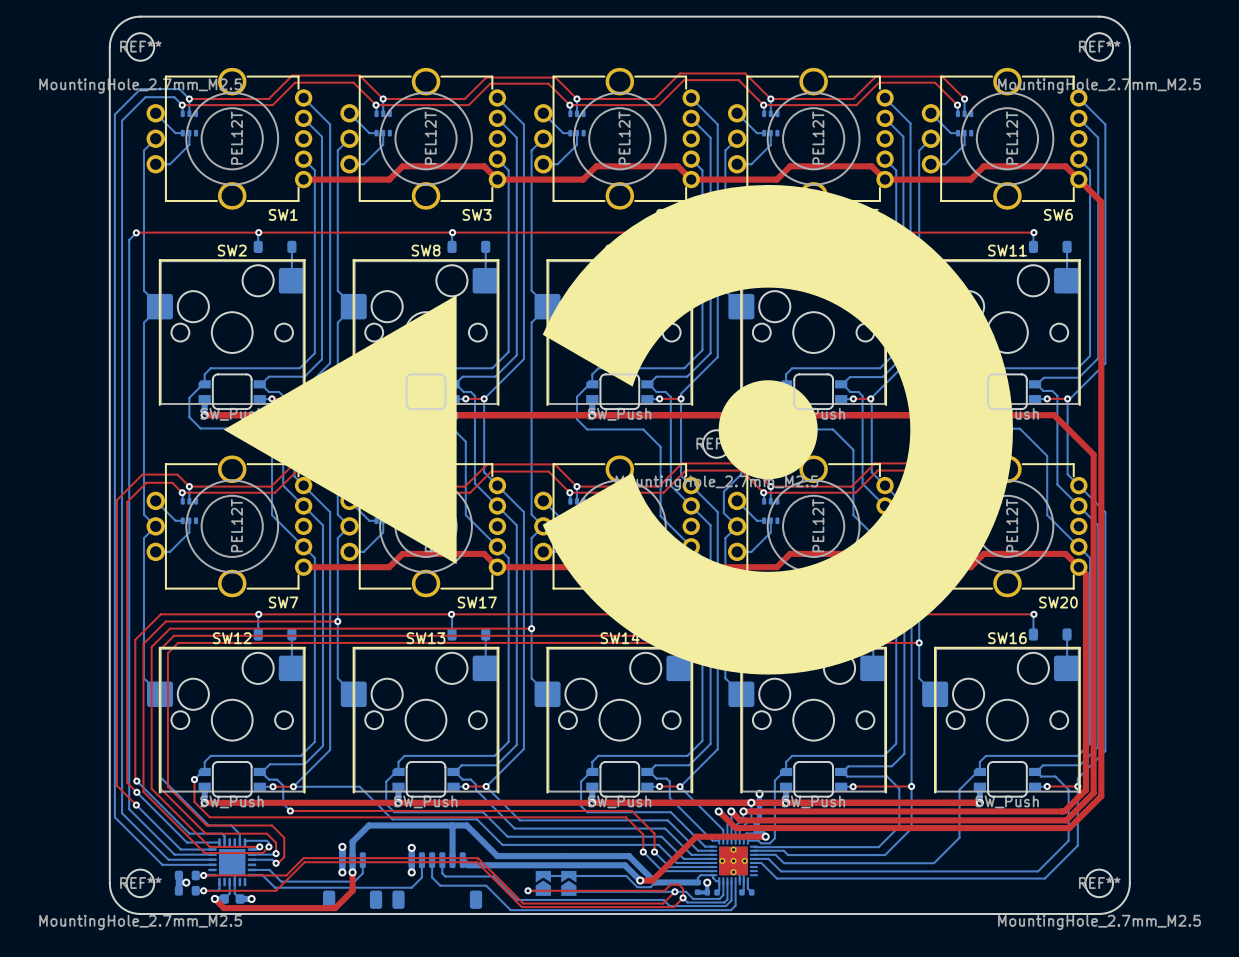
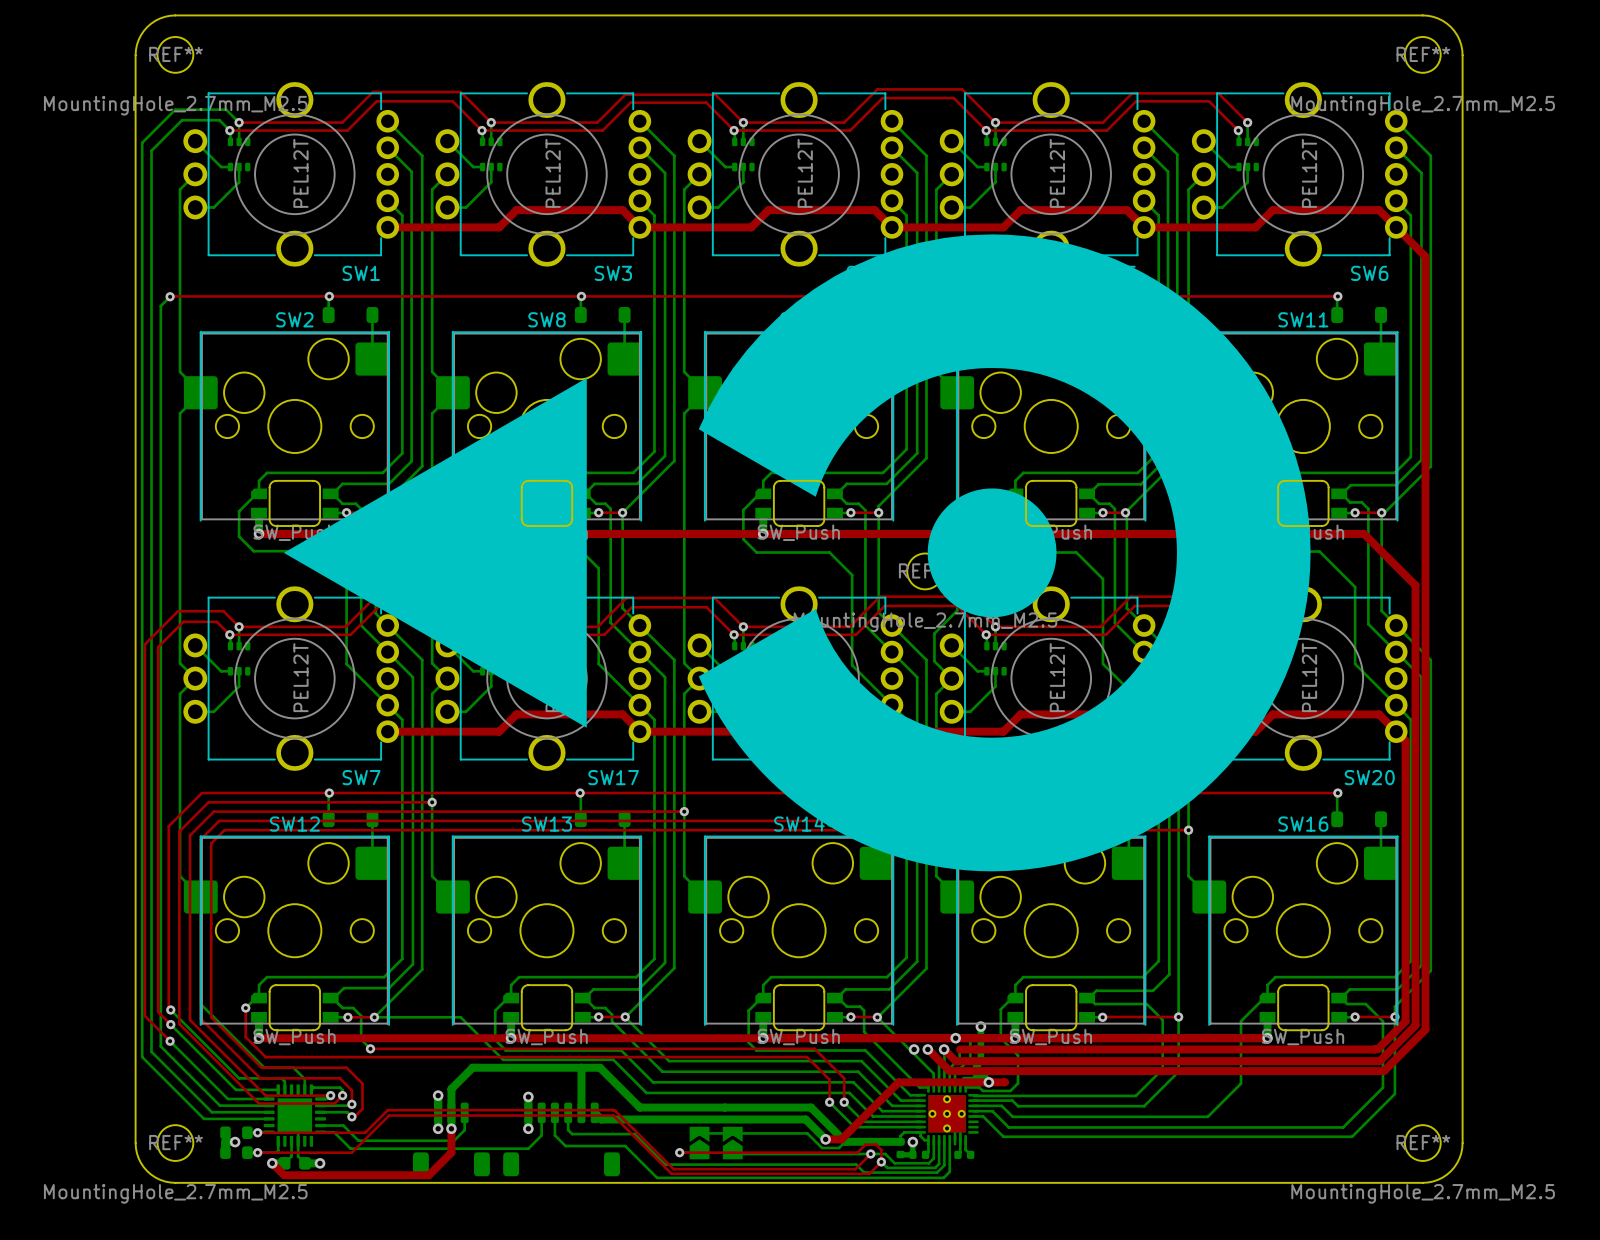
via: none -> (955, 1038)
via: (751, 802) -> none
bottom track: (774, 802) (774, 838) (769, 843) -> (1000, 1038) (1018, 1055) (1018, 1083) (1010, 1090) (994, 1090)
via: none -> (914, 1049)
via: (743, 811) -> none
top track: none -> (988, 1082) (1004, 1082)

